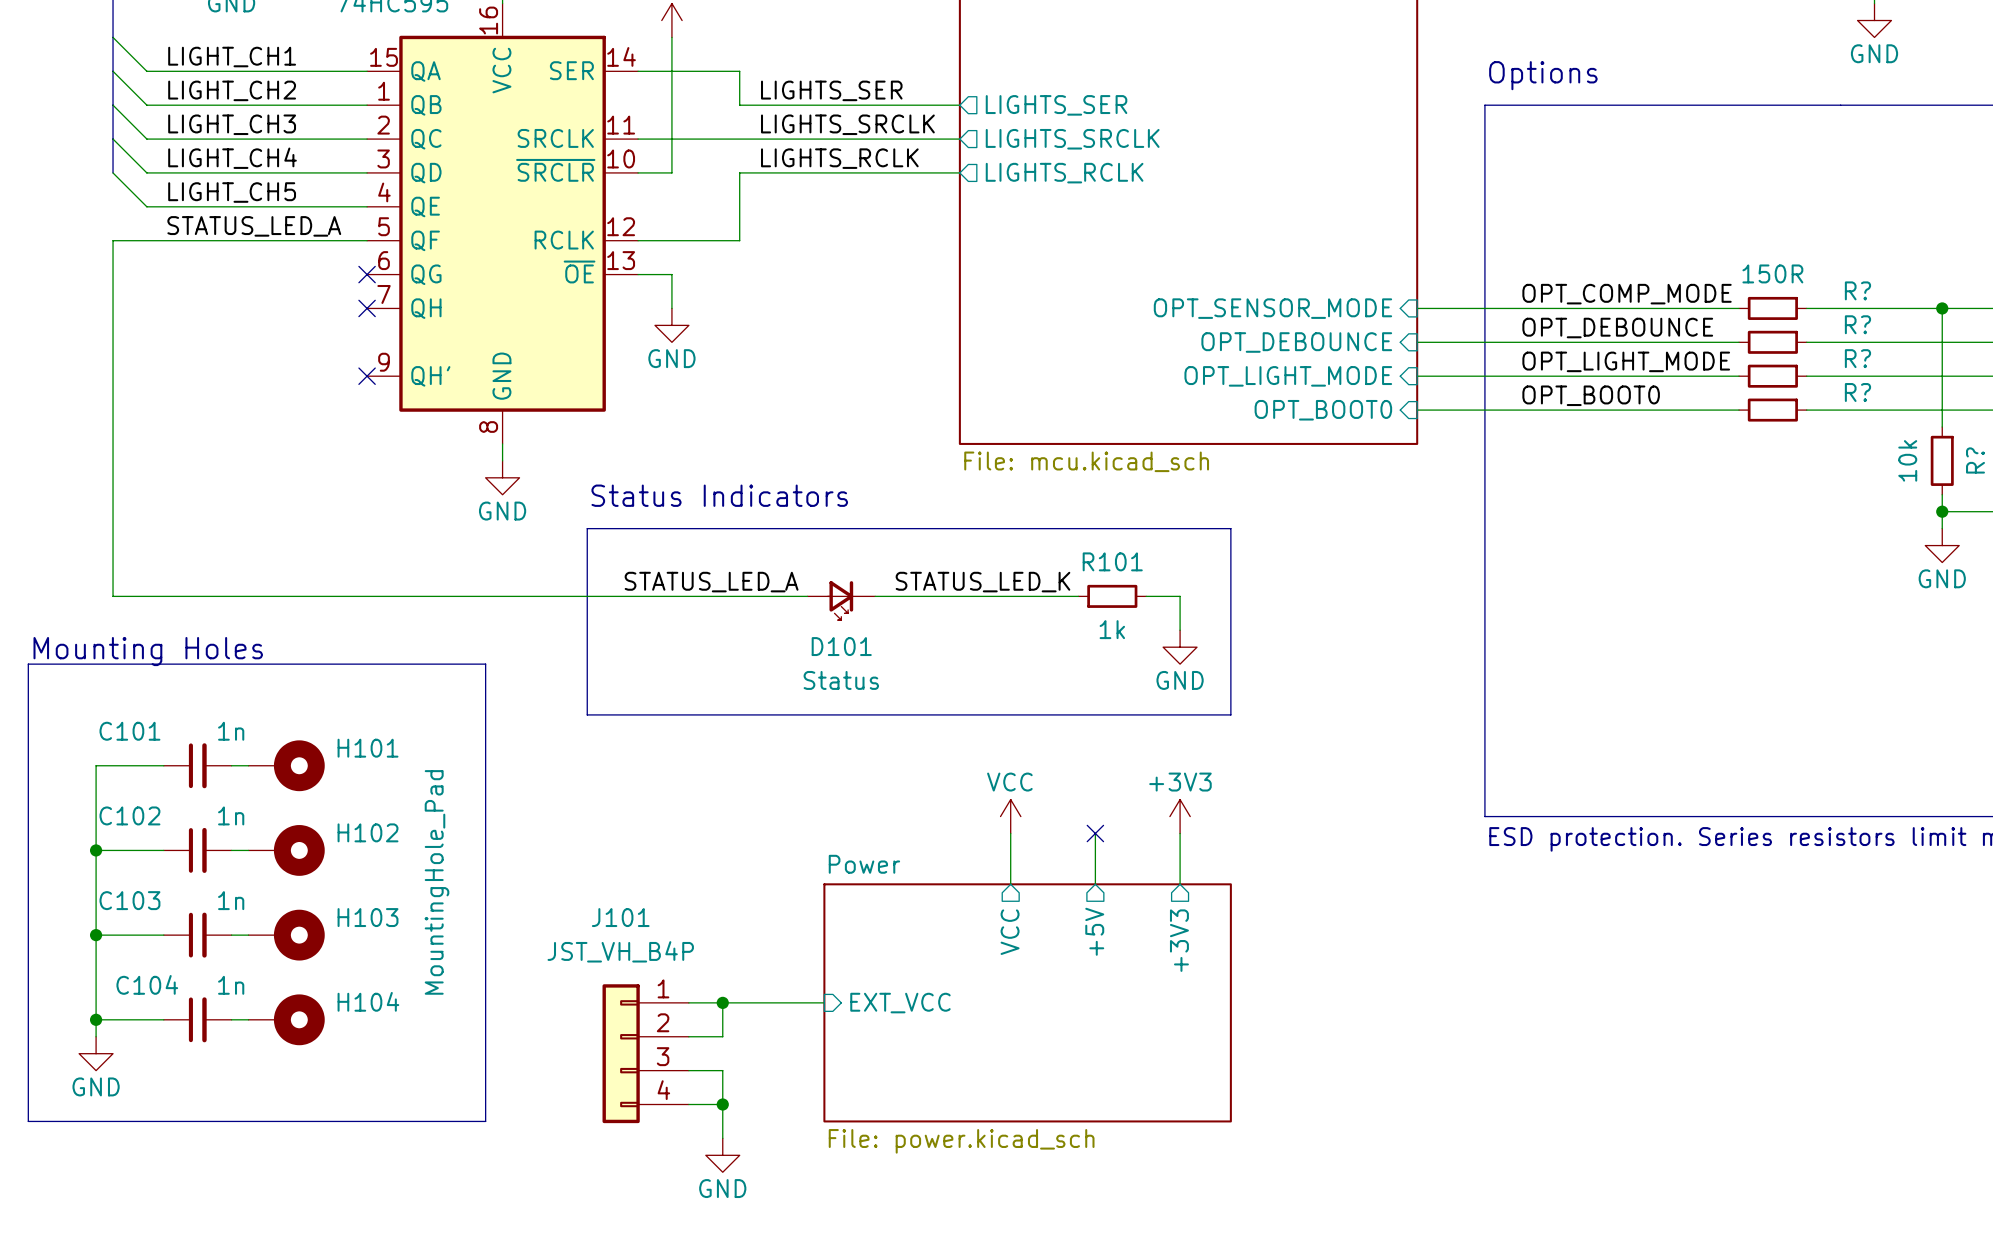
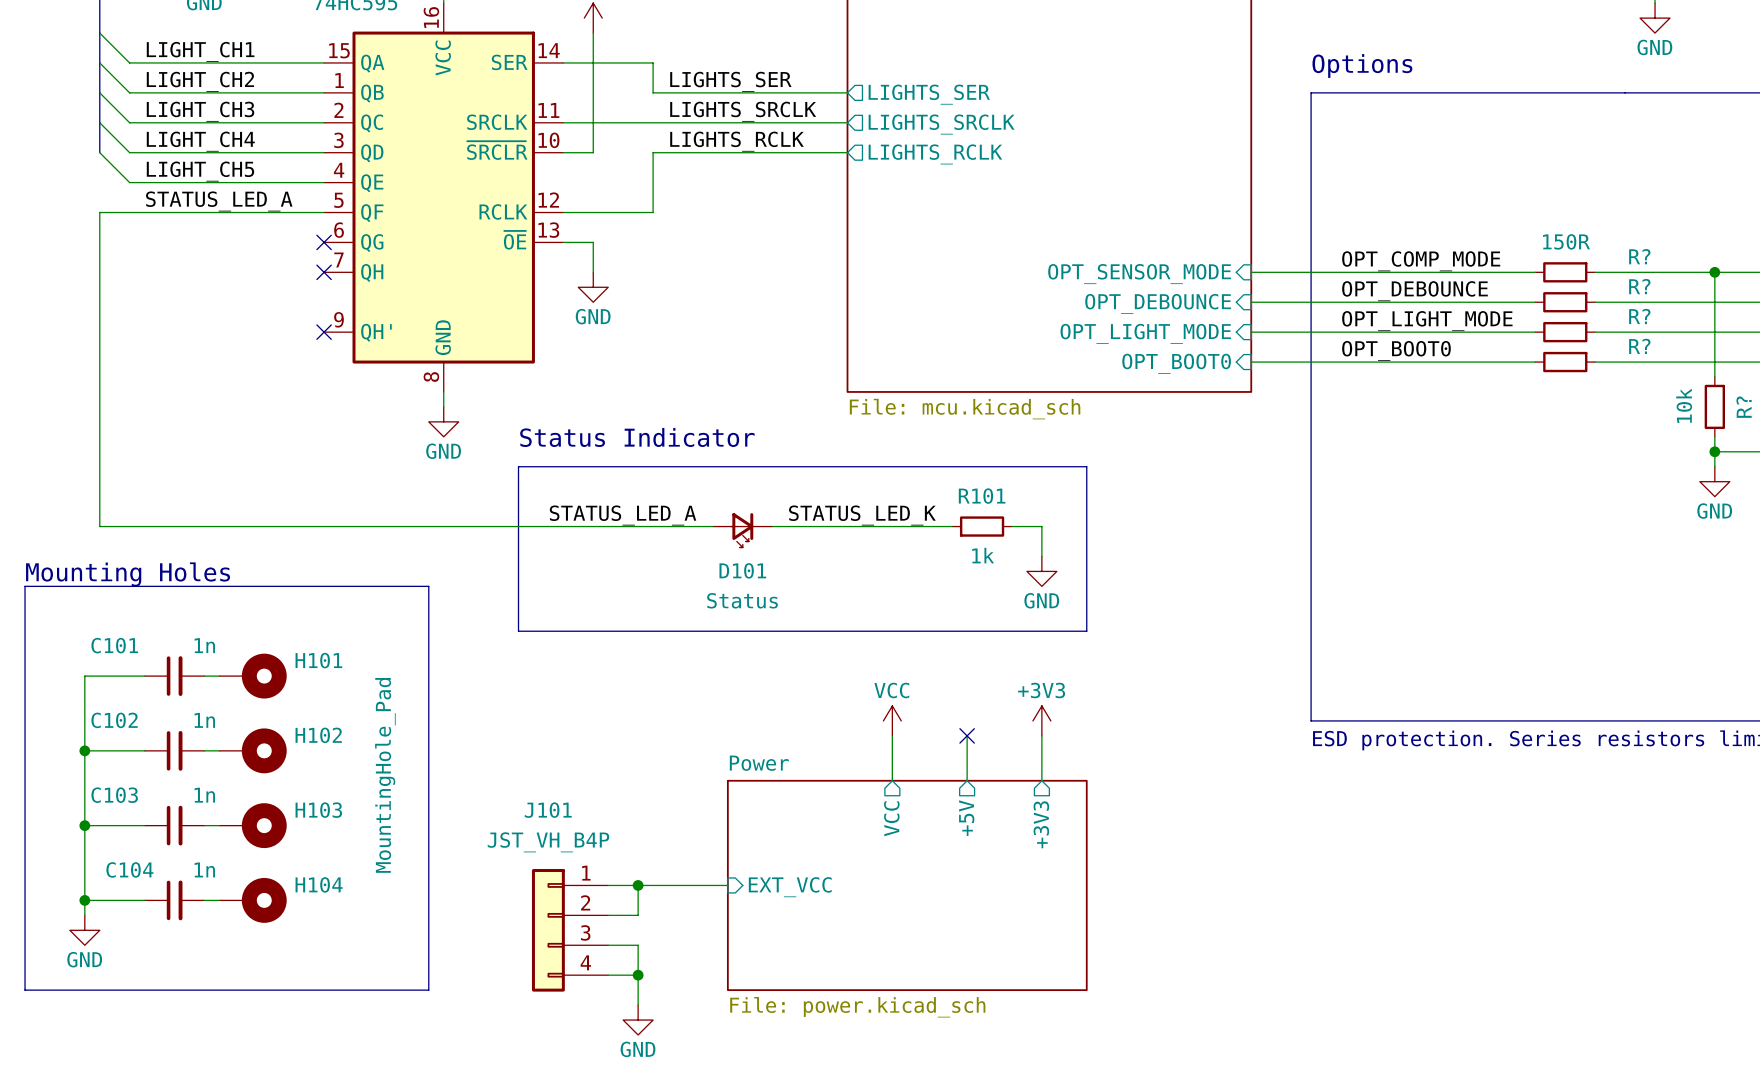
text: Status Indicators (719, 495) -> Status Indicator (637, 437)

